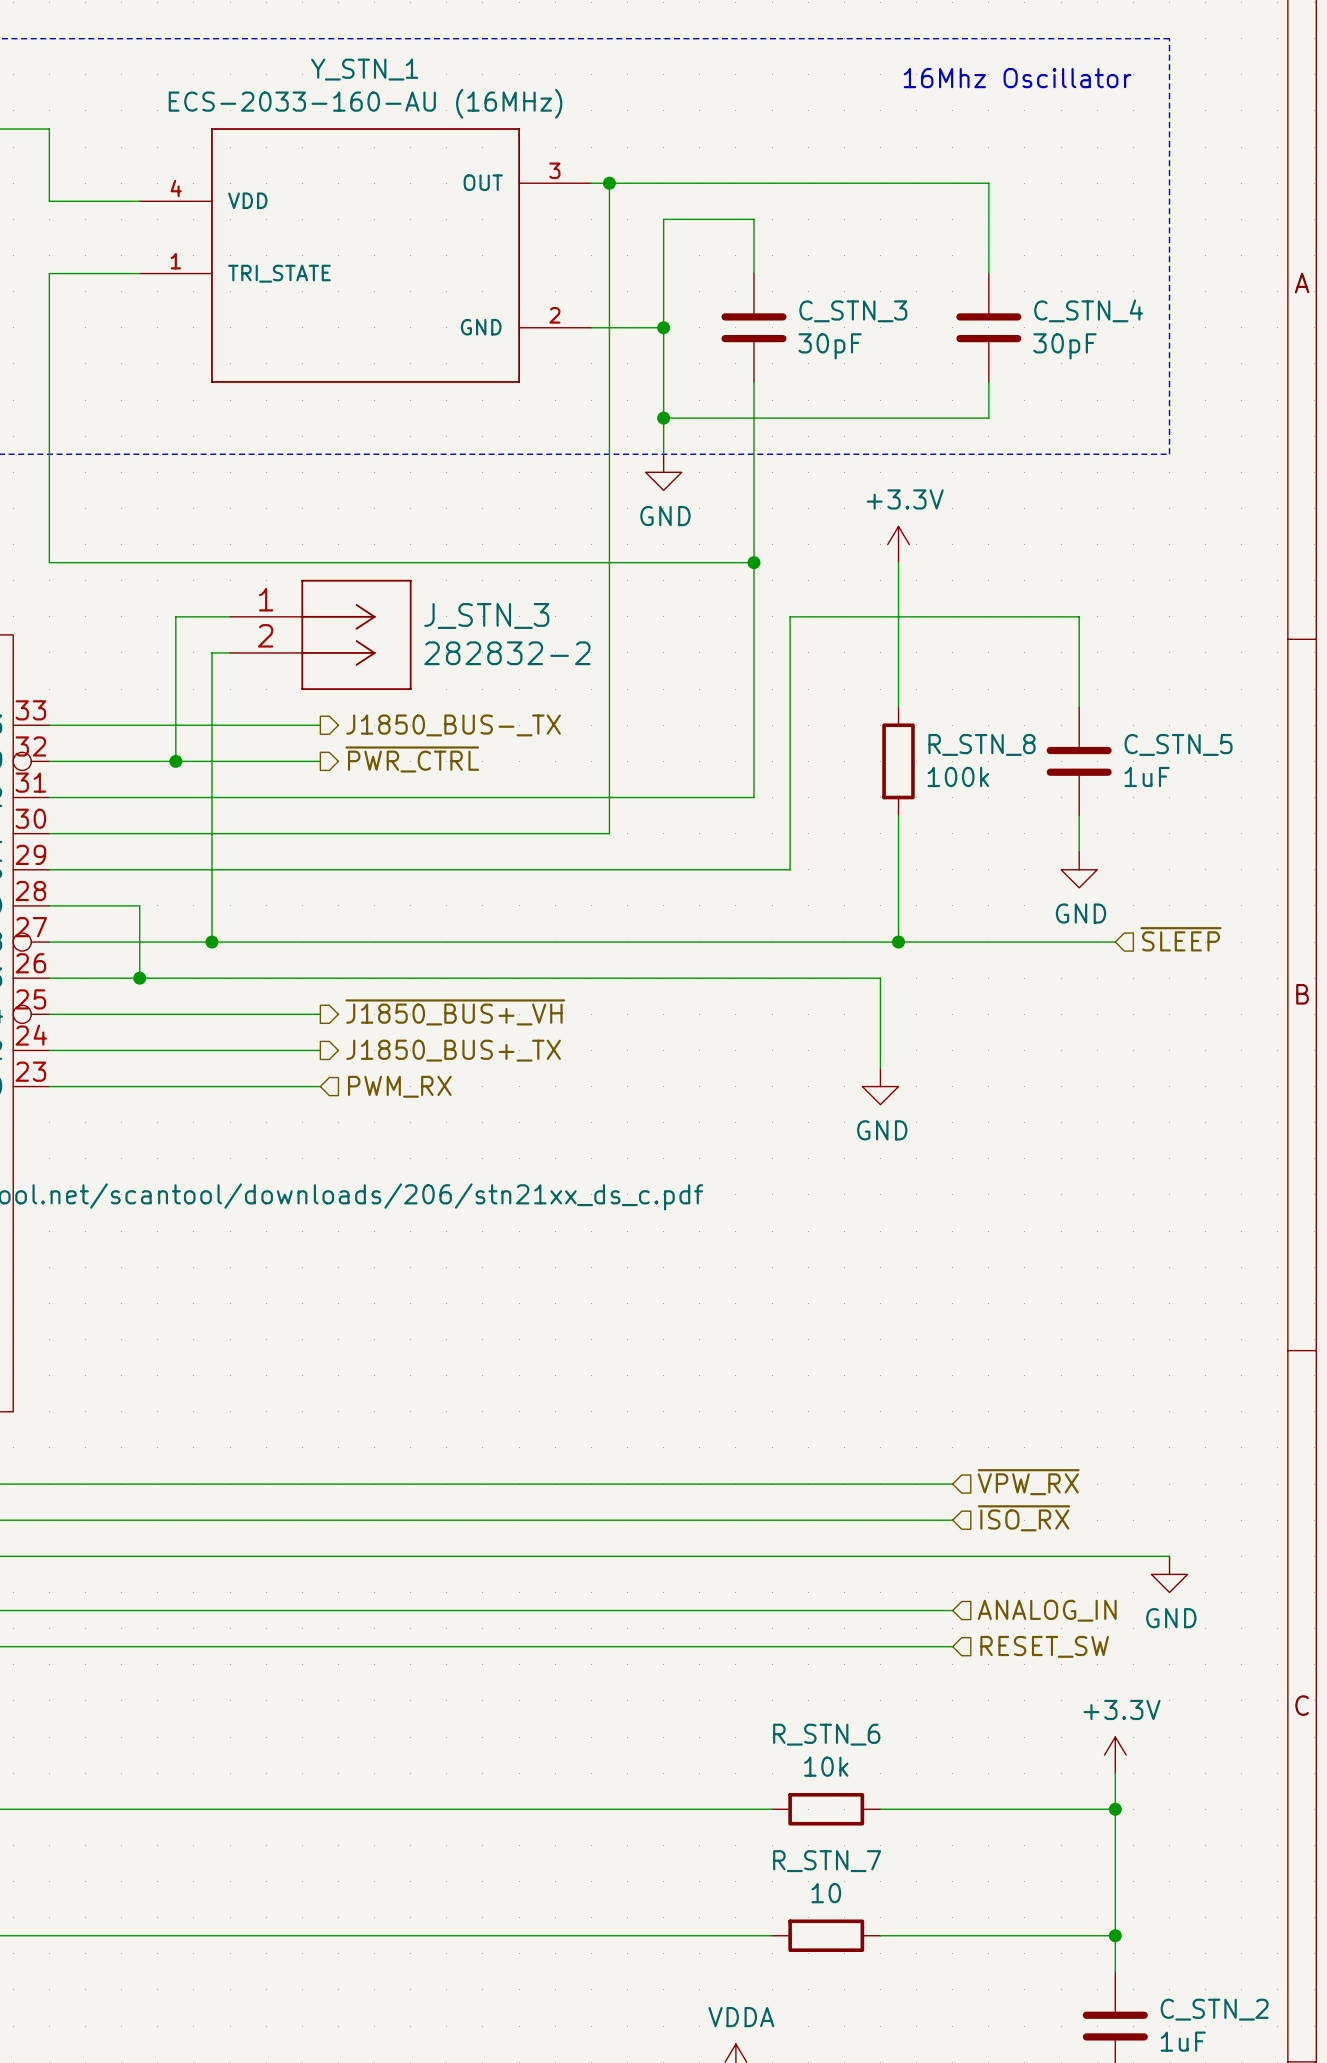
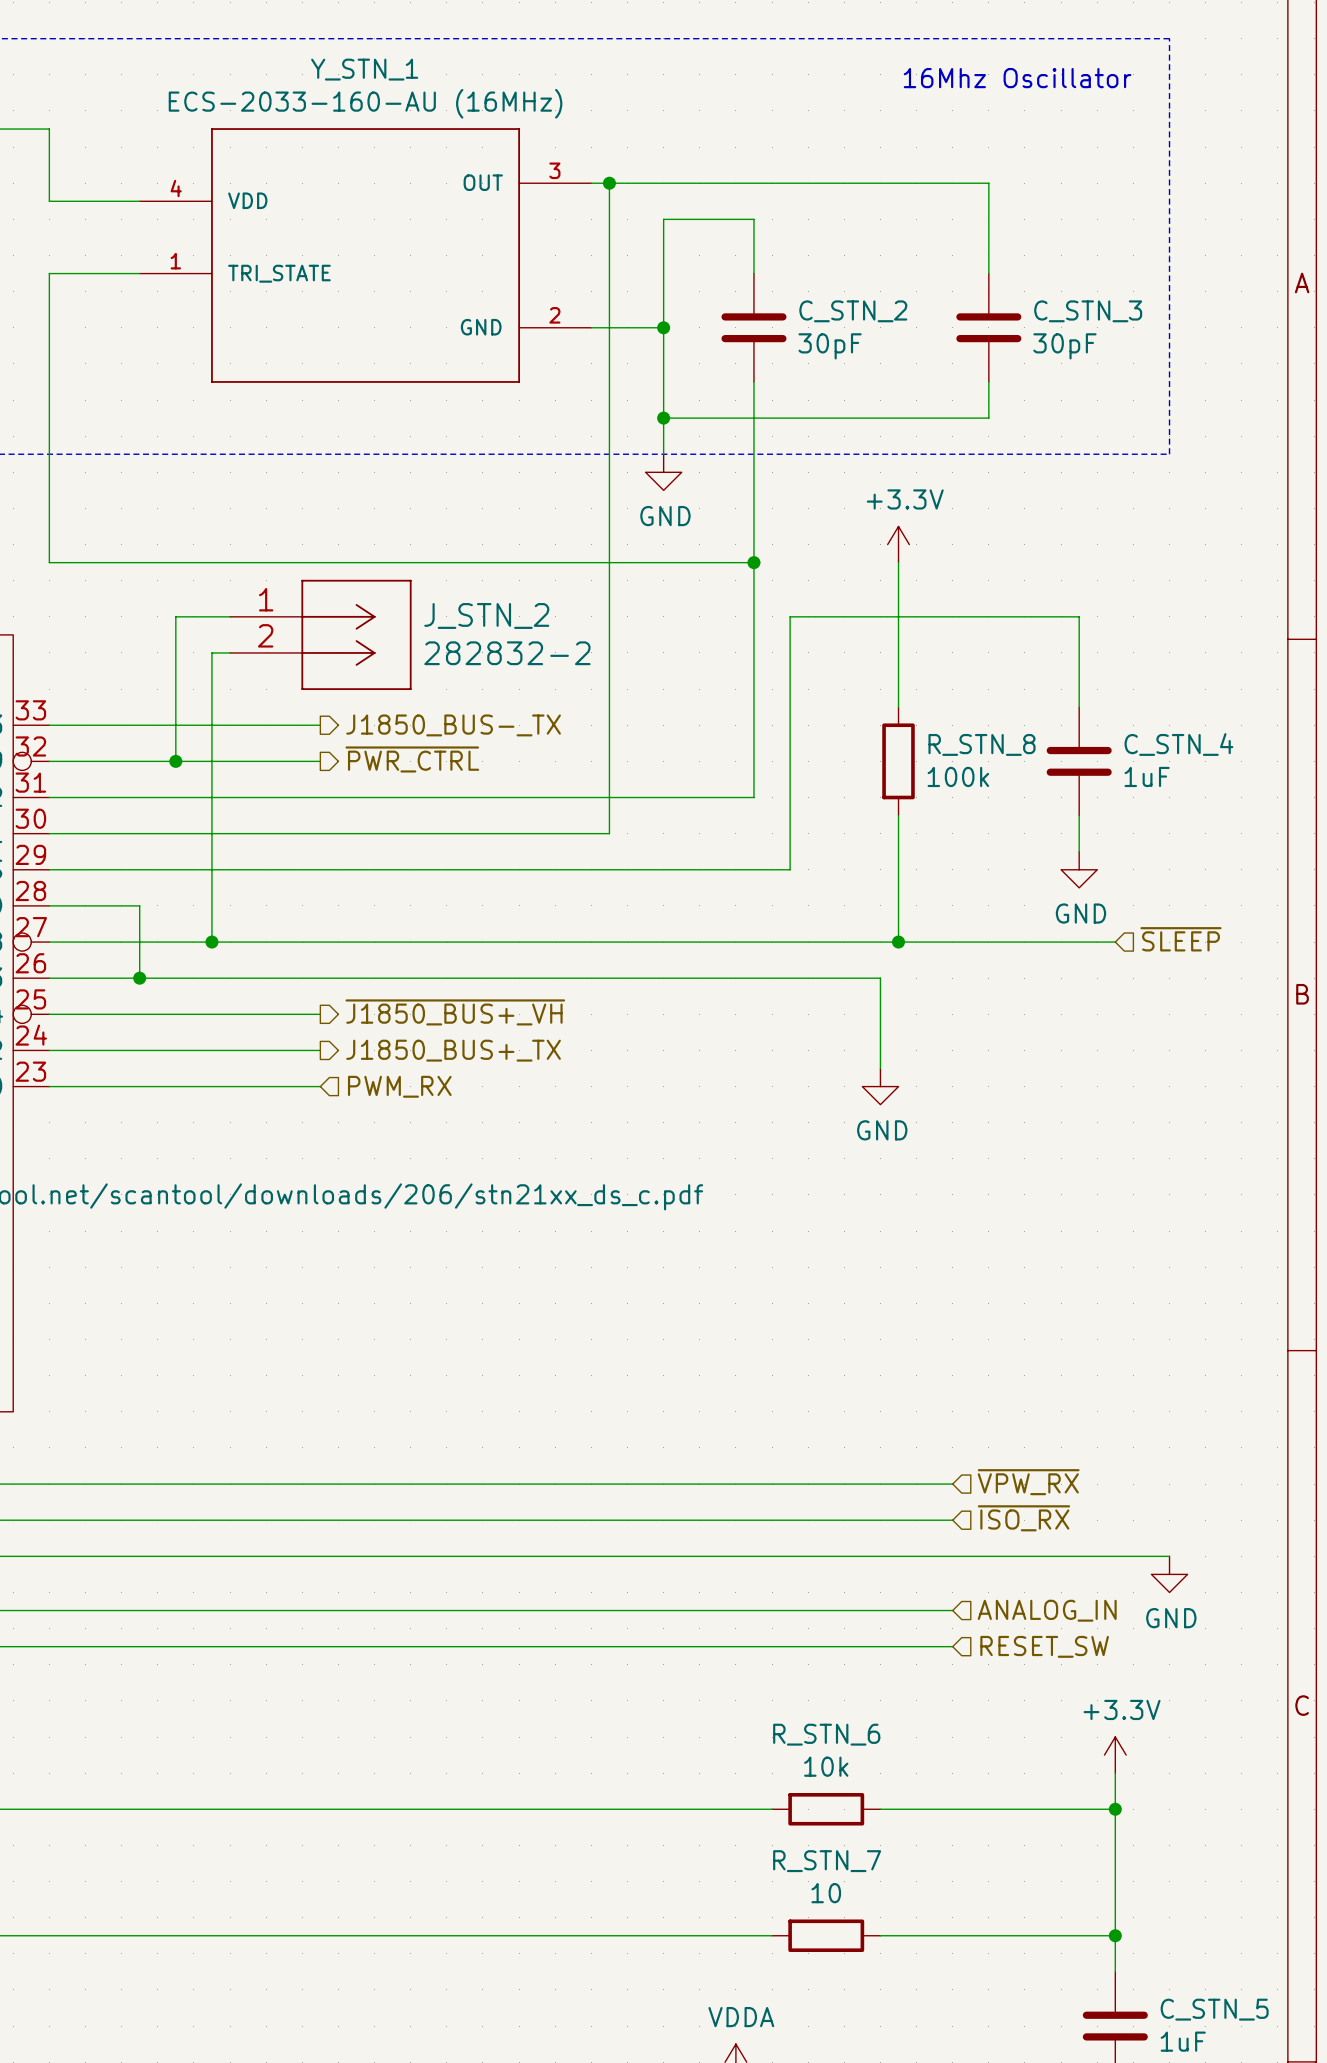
C_STN_4 name: C_STN_4 (1088, 310) -> C_STN_3 (1088, 311)
C_STN_3 name: C_STN_3 (853, 311) -> C_STN_2 (853, 311)
J_STN_3 name: J_STN_3 (486, 615) -> J_STN_2 (486, 615)
C_STN_5 name: C_STN_5 (1178, 744) -> C_STN_4 (1178, 744)
C_STN_2 name: C_STN_2 (1214, 2009) -> C_STN_5 (1214, 2009)

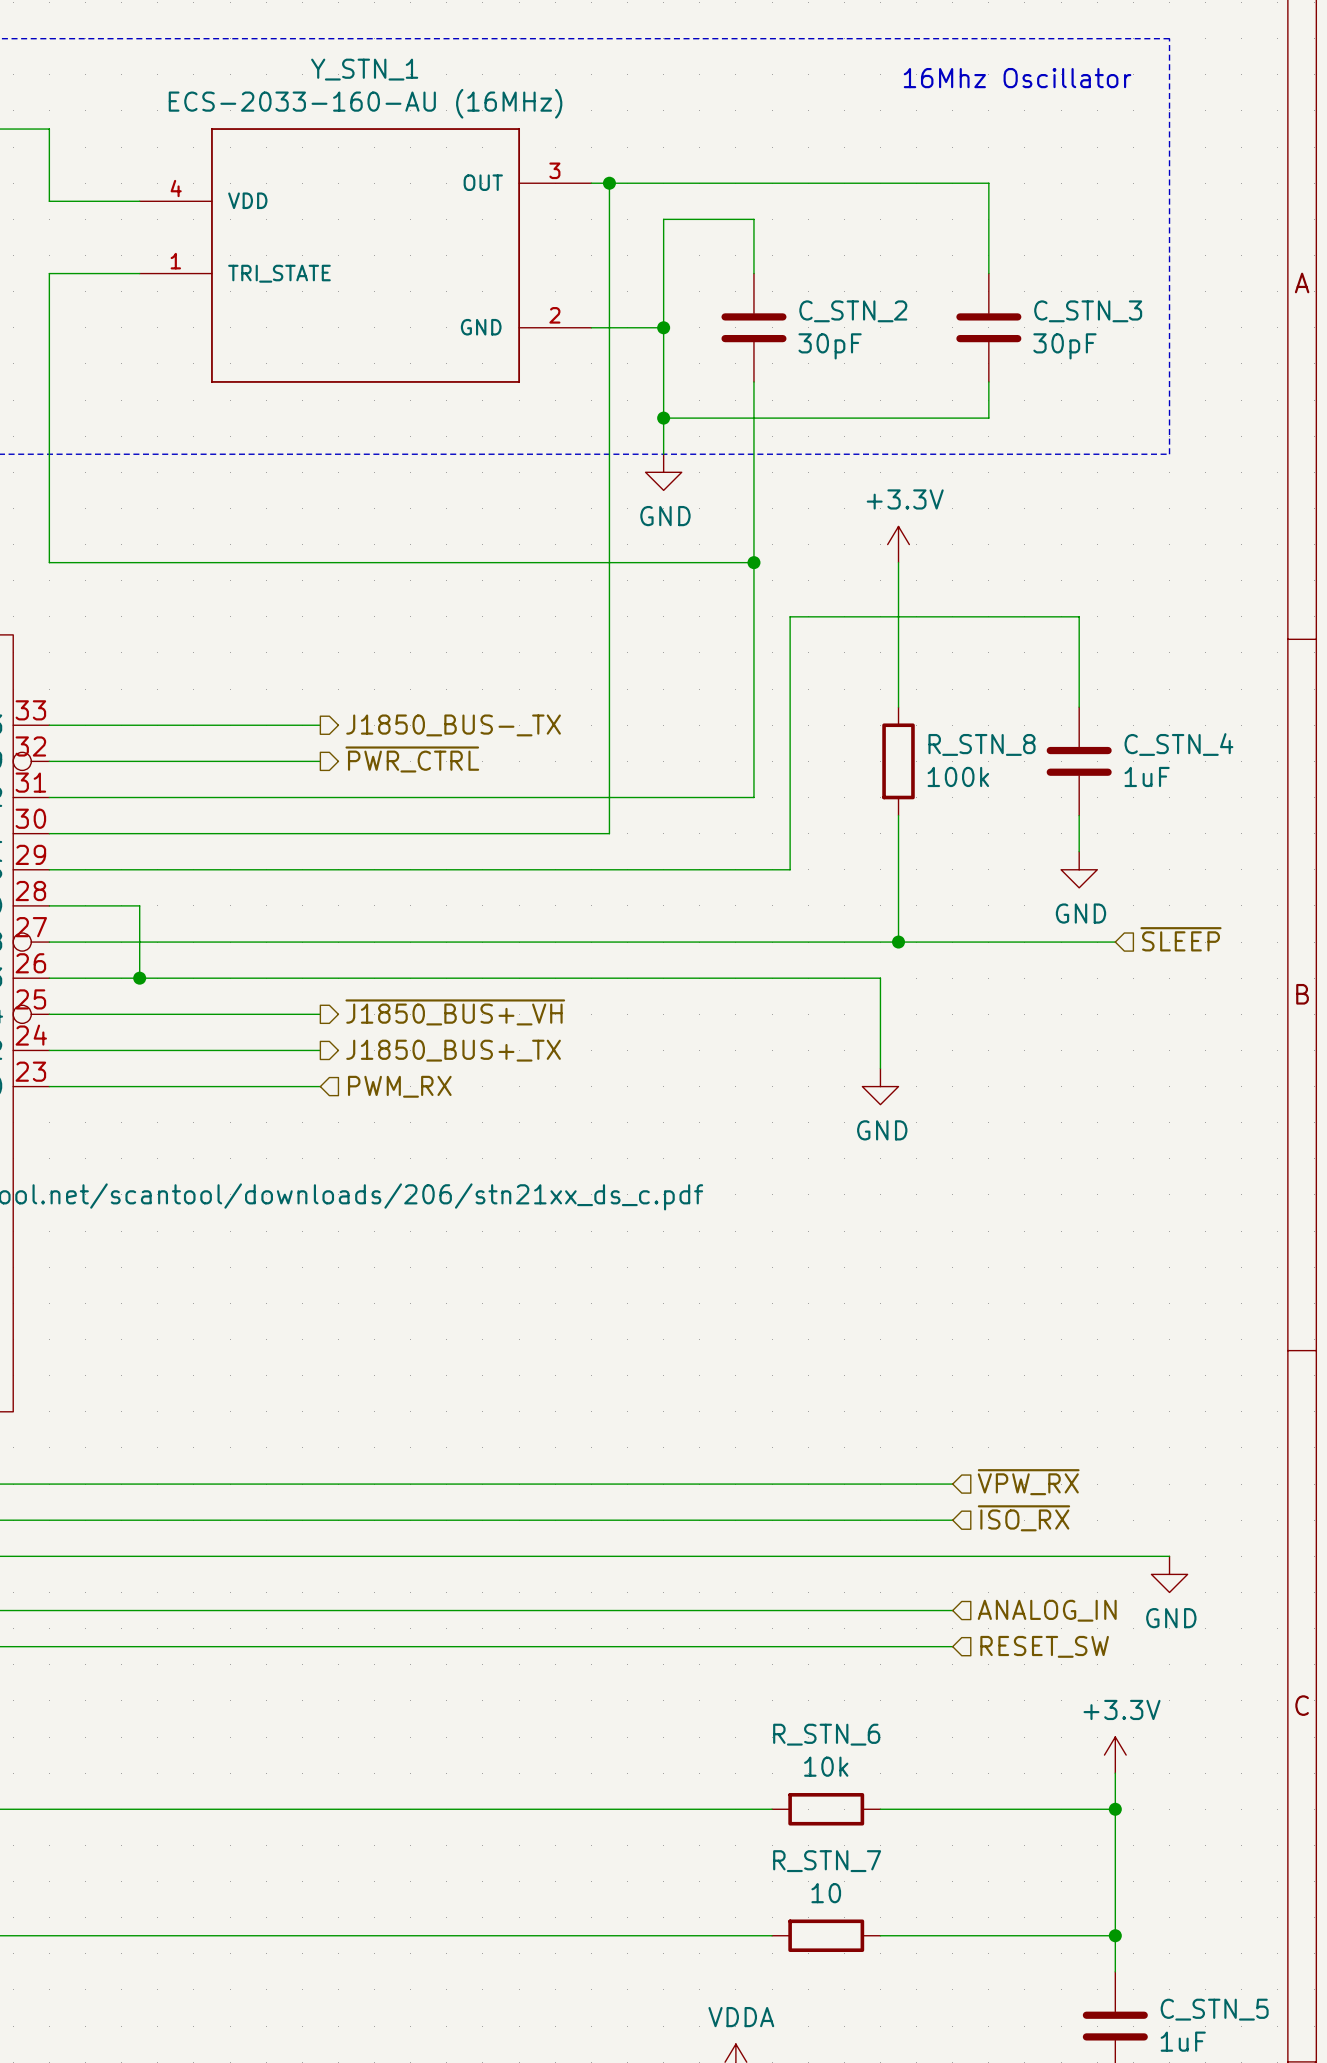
wire: (230, 616) (175, 616) (175, 761) -> none
J_STN_2: 282832-2 (320, 634) -> none
wire: (230, 652) (211, 652) (211, 942) -> none
junction: (175, 761) -> none
junction: (211, 942) -> none

